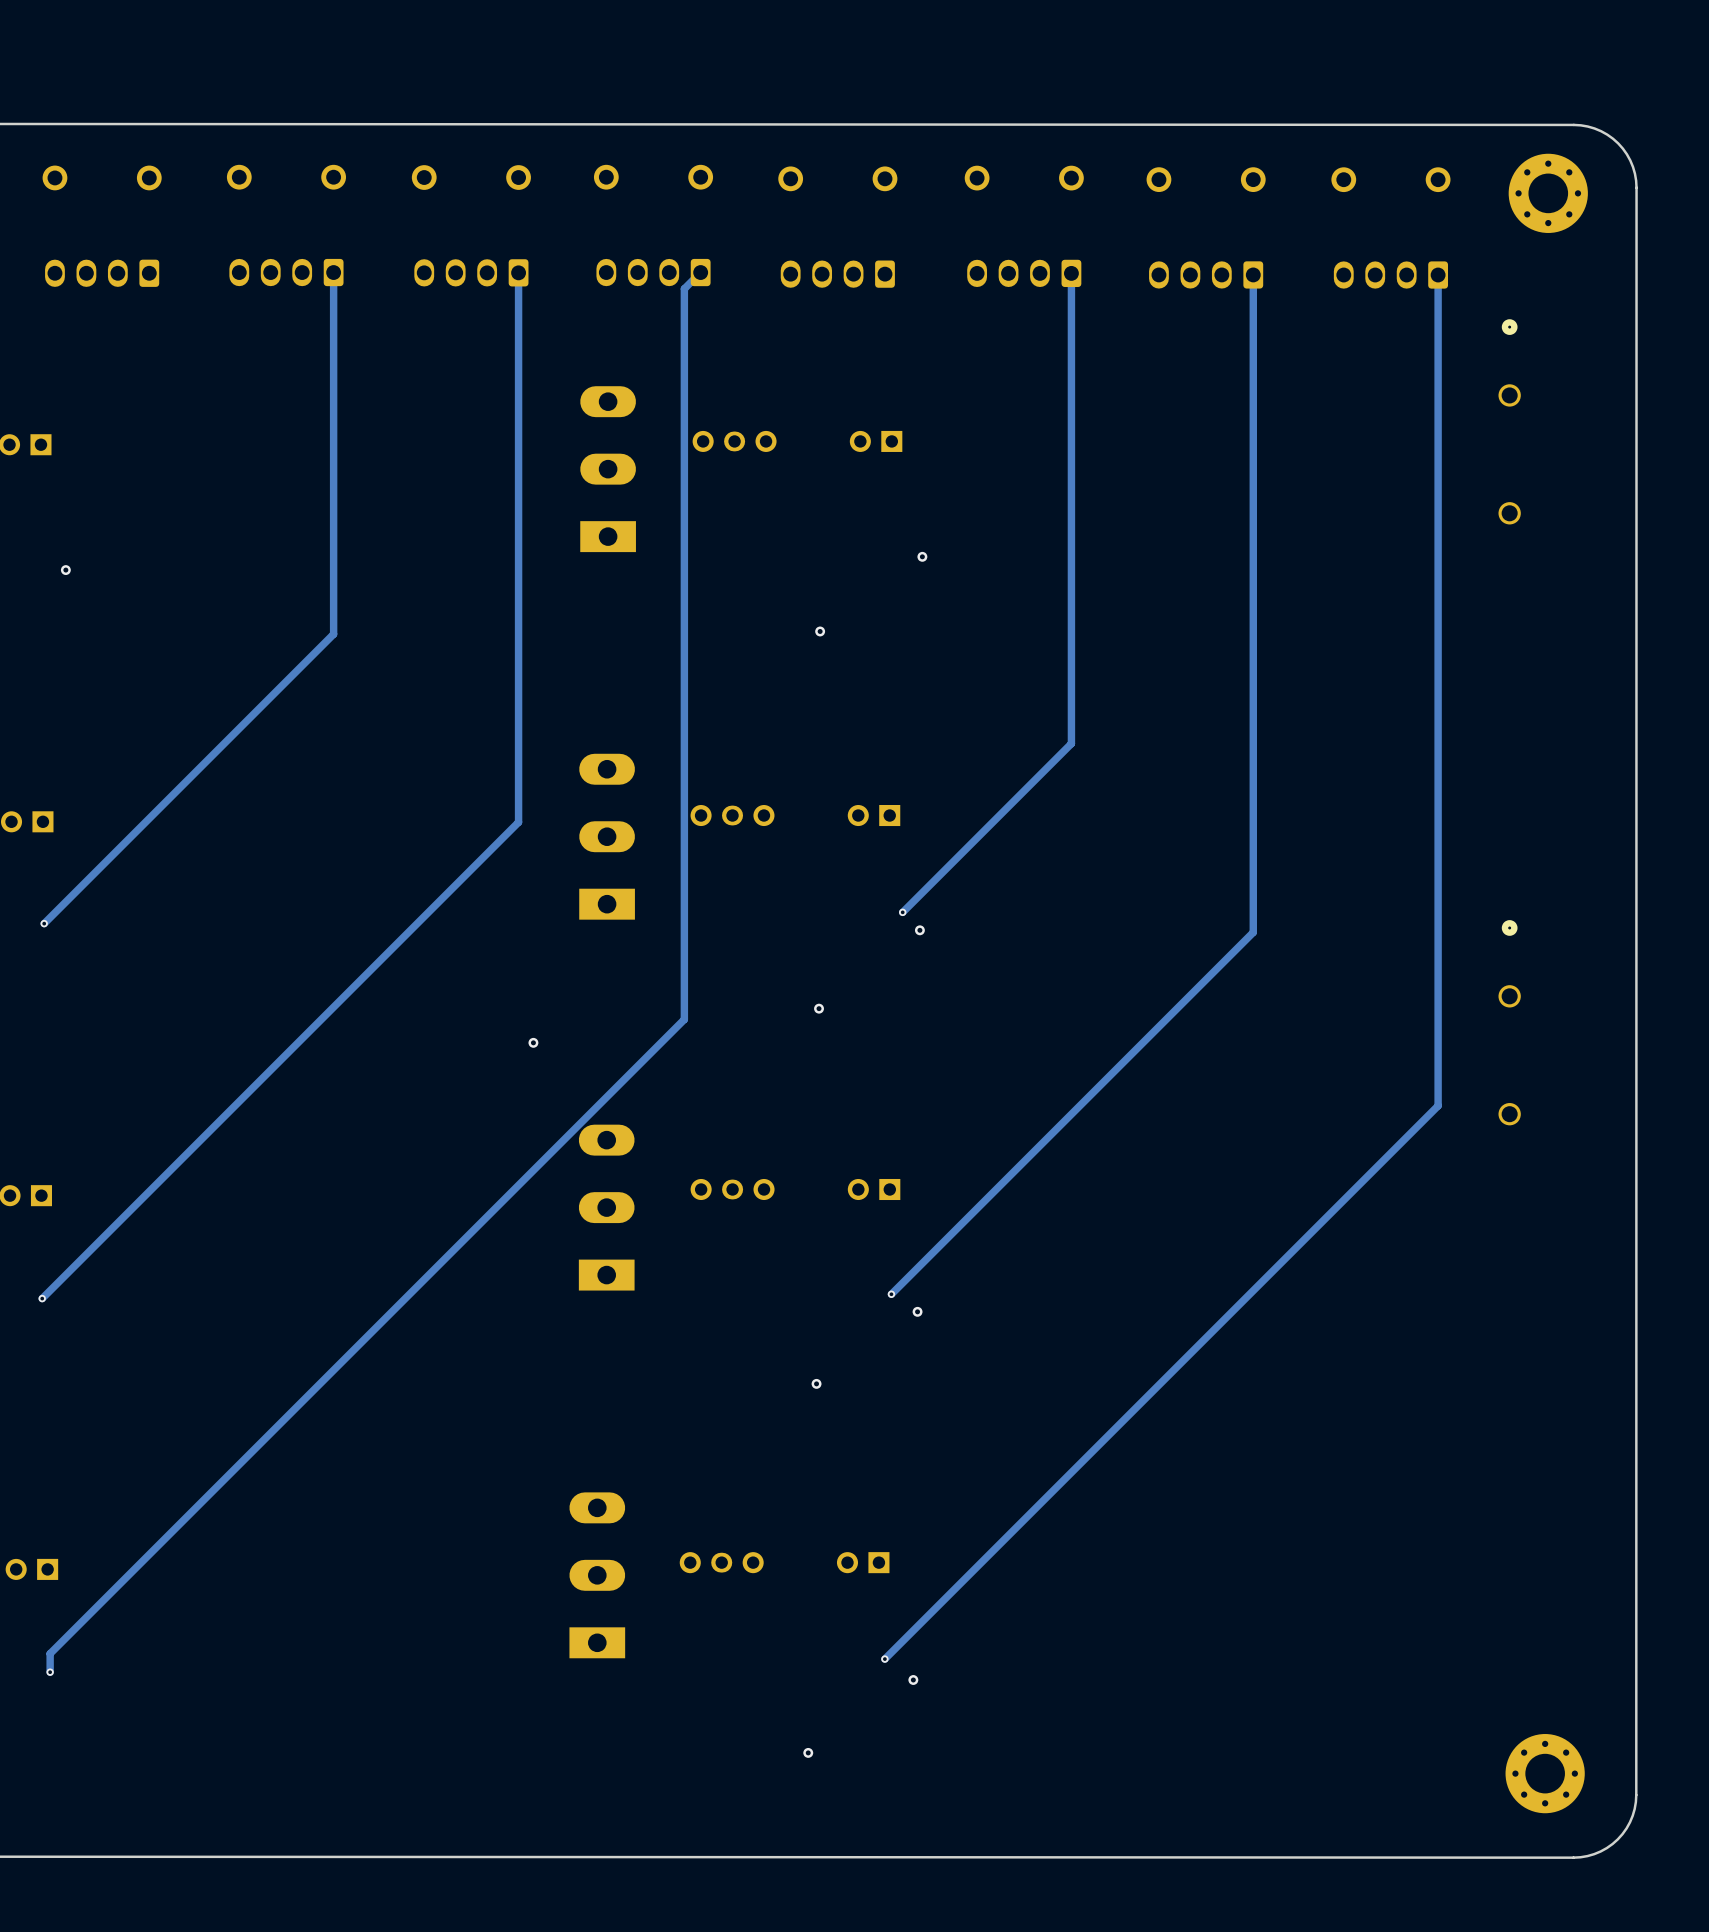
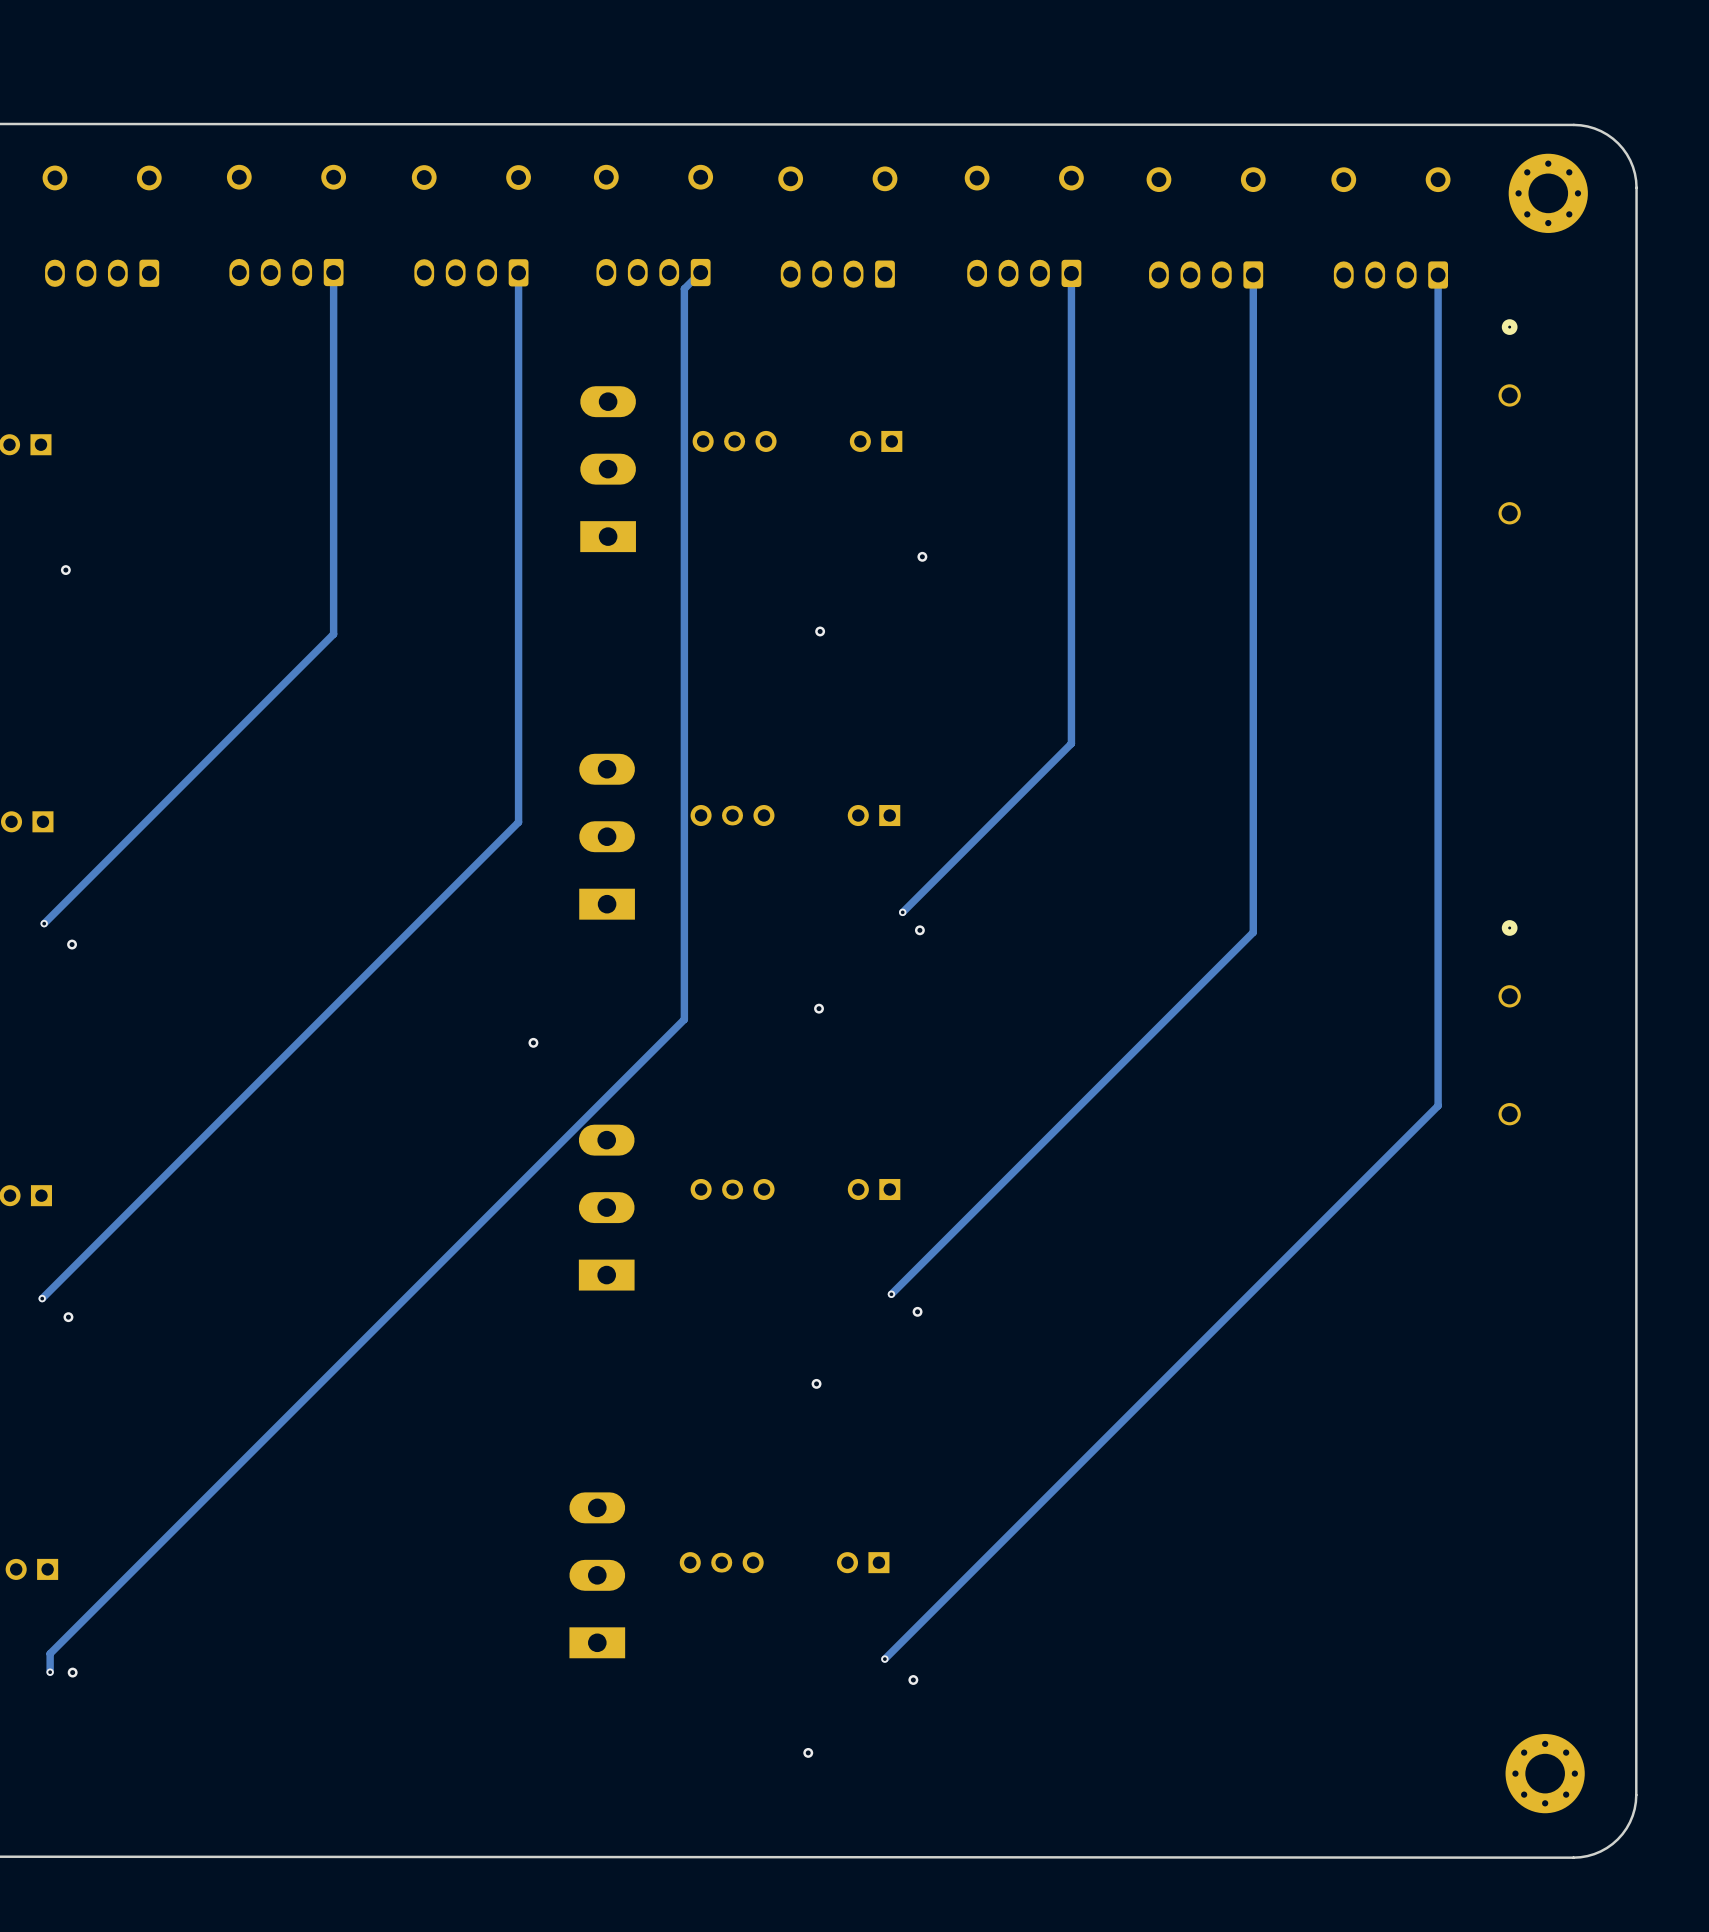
via: none -> (72, 944)
via: none -> (68, 1317)
via: none -> (72, 1672)

